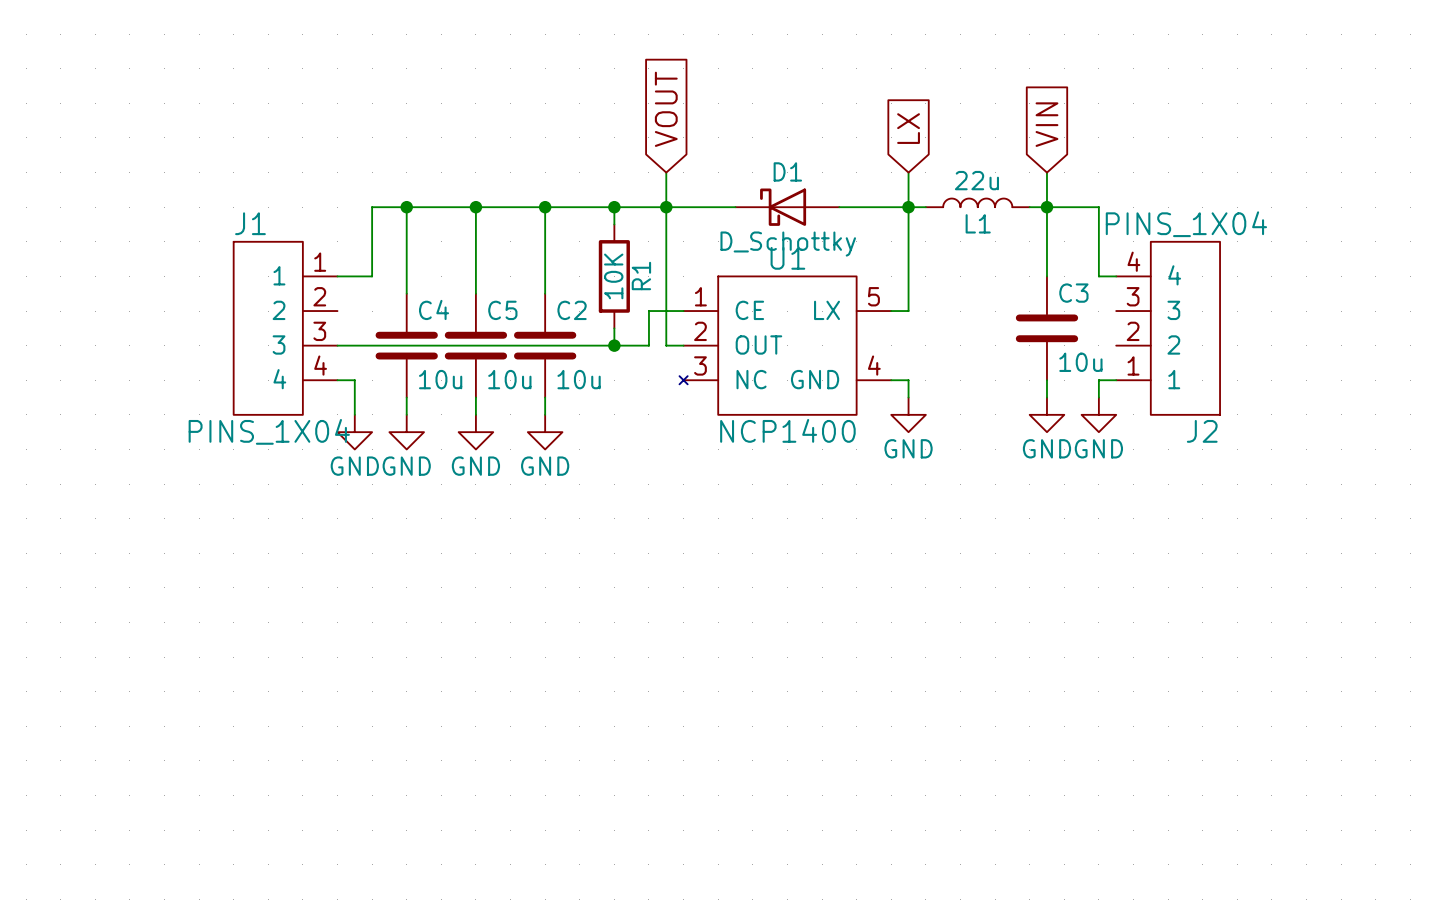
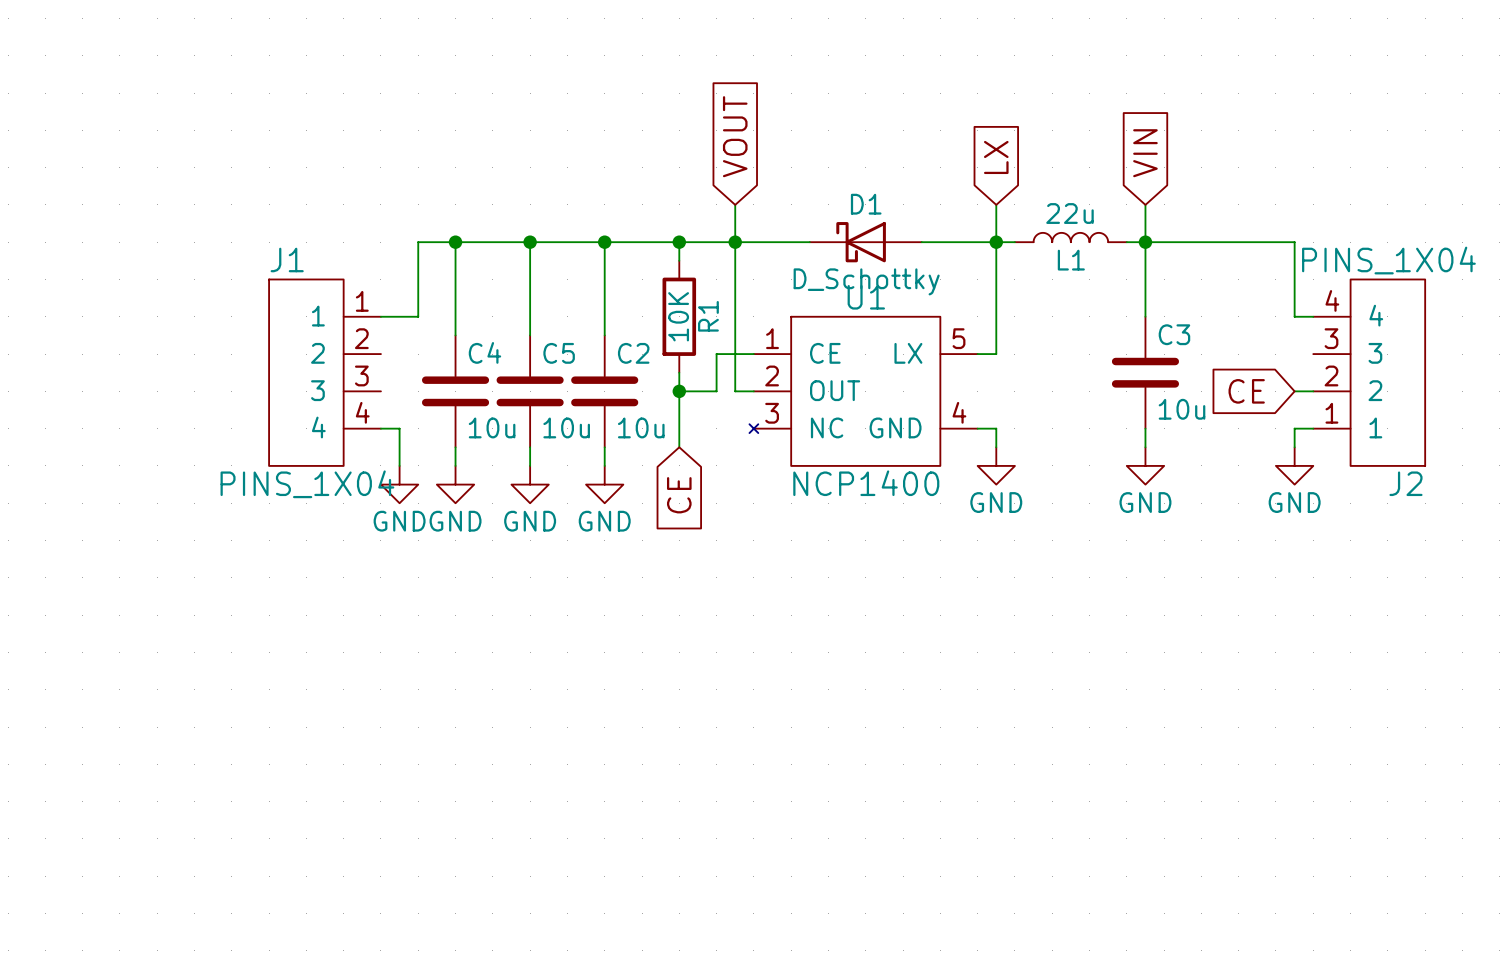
wire: (1098, 207) (1098, 276) (1116, 276) -> (1201, 242) (1294, 242) (1294, 316) (1313, 316)
J2 position: (1168, 328) -> (1369, 372)
wire: (337, 345) (614, 345) -> (679, 447) (679, 391)
global label: none -> CE (1246, 391)
wire: none -> (1294, 391) (1313, 391)
wire: (1116, 380) (1098, 380) (1098, 397) -> (1313, 428) (1294, 428) (1294, 447)
power symbol position: GND (1098, 414) -> GND (1294, 465)
global label: none -> CE (679, 495)

